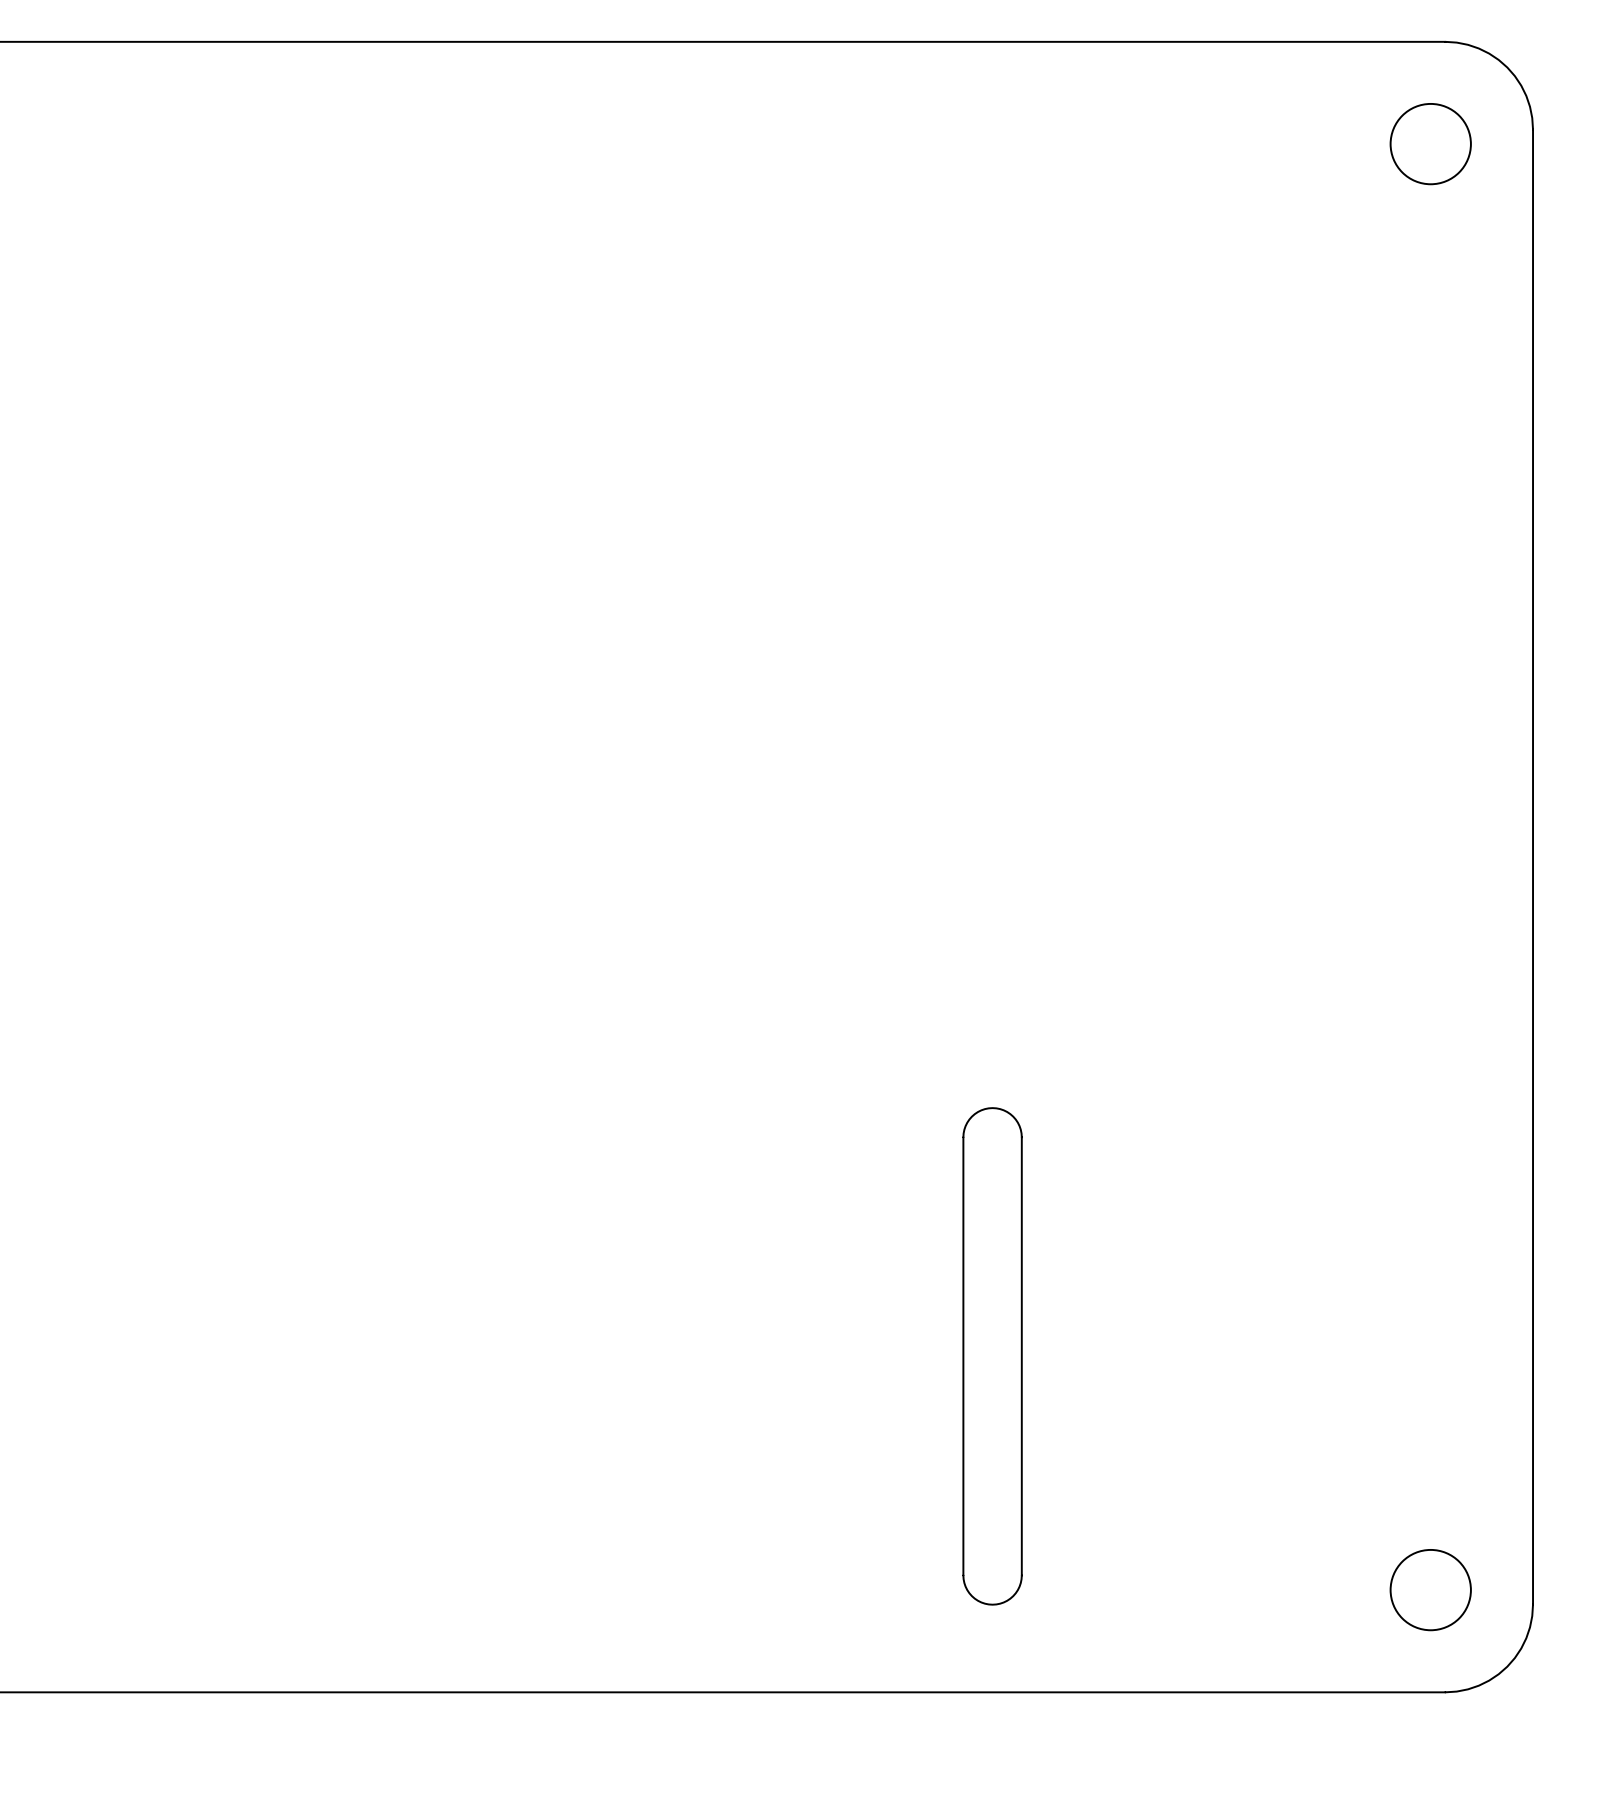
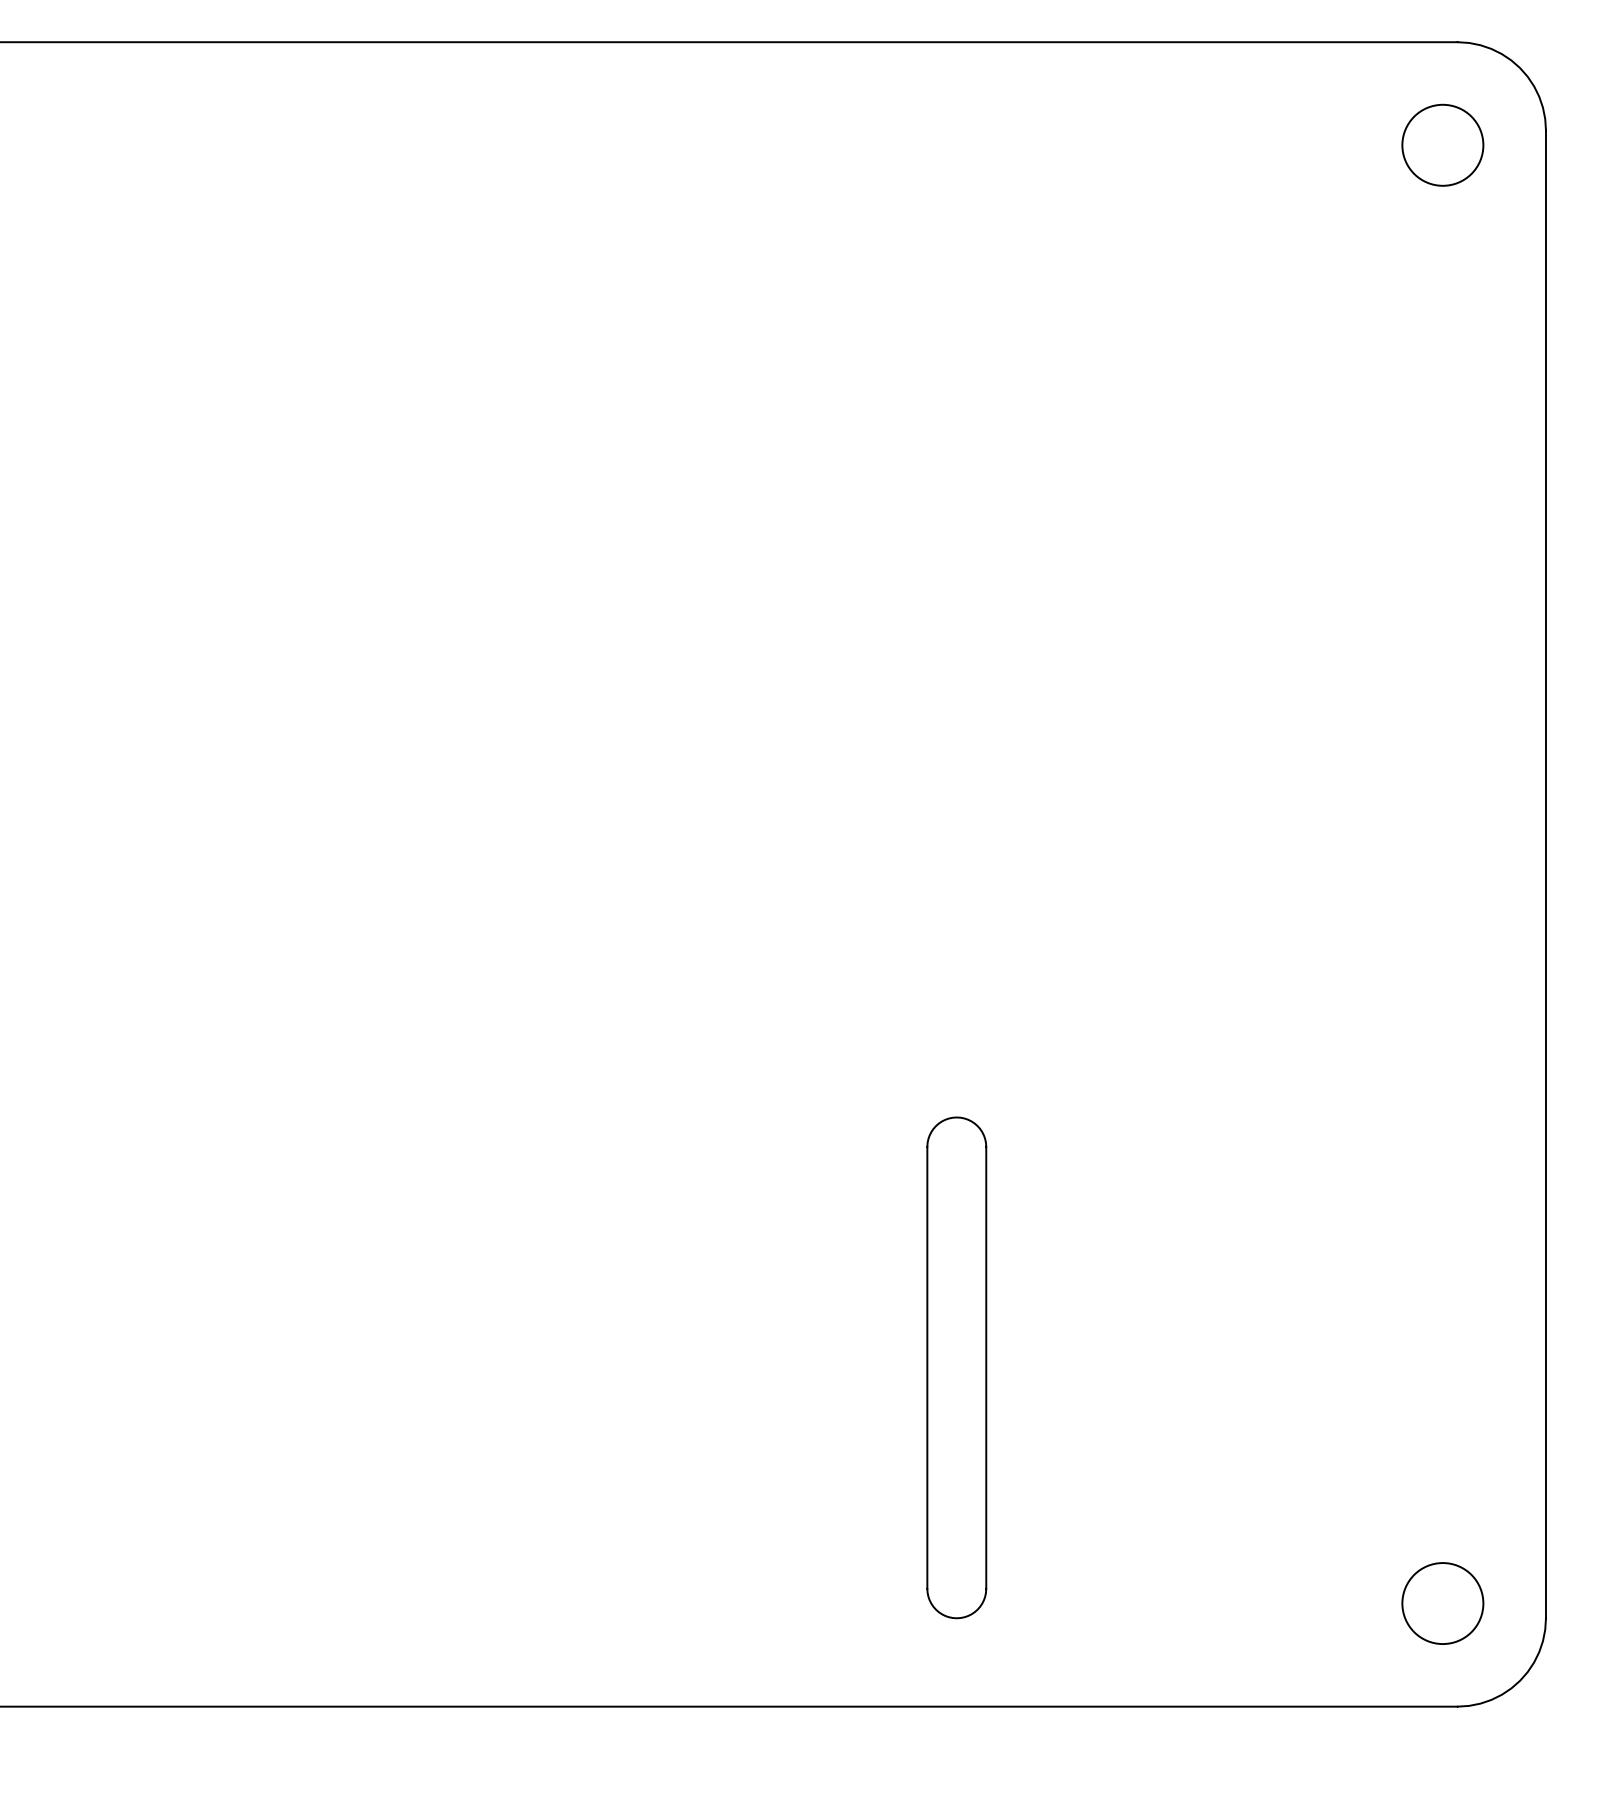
board edge: (963, 1137) (963, 1579) (967, 1590) (974, 1598) (985, 1603) (996, 1604) (1007, 1600) (1015, 1593) (1021, 1575) (1021, 1133) (1013, 1116) (1003, 1110) (992, 1108) (981, 1110) (971, 1116) (965, 1126) (963, 1137) -> (927, 1146) (927, 1592) (931, 1603) (938, 1612) (949, 1617) (960, 1618) (971, 1614) (980, 1606) (985, 1596) (986, 1588) (986, 1143) (982, 1132) (977, 1126) (968, 1119) (956, 1117) (945, 1119) (935, 1126) (929, 1135) (927, 1146)

